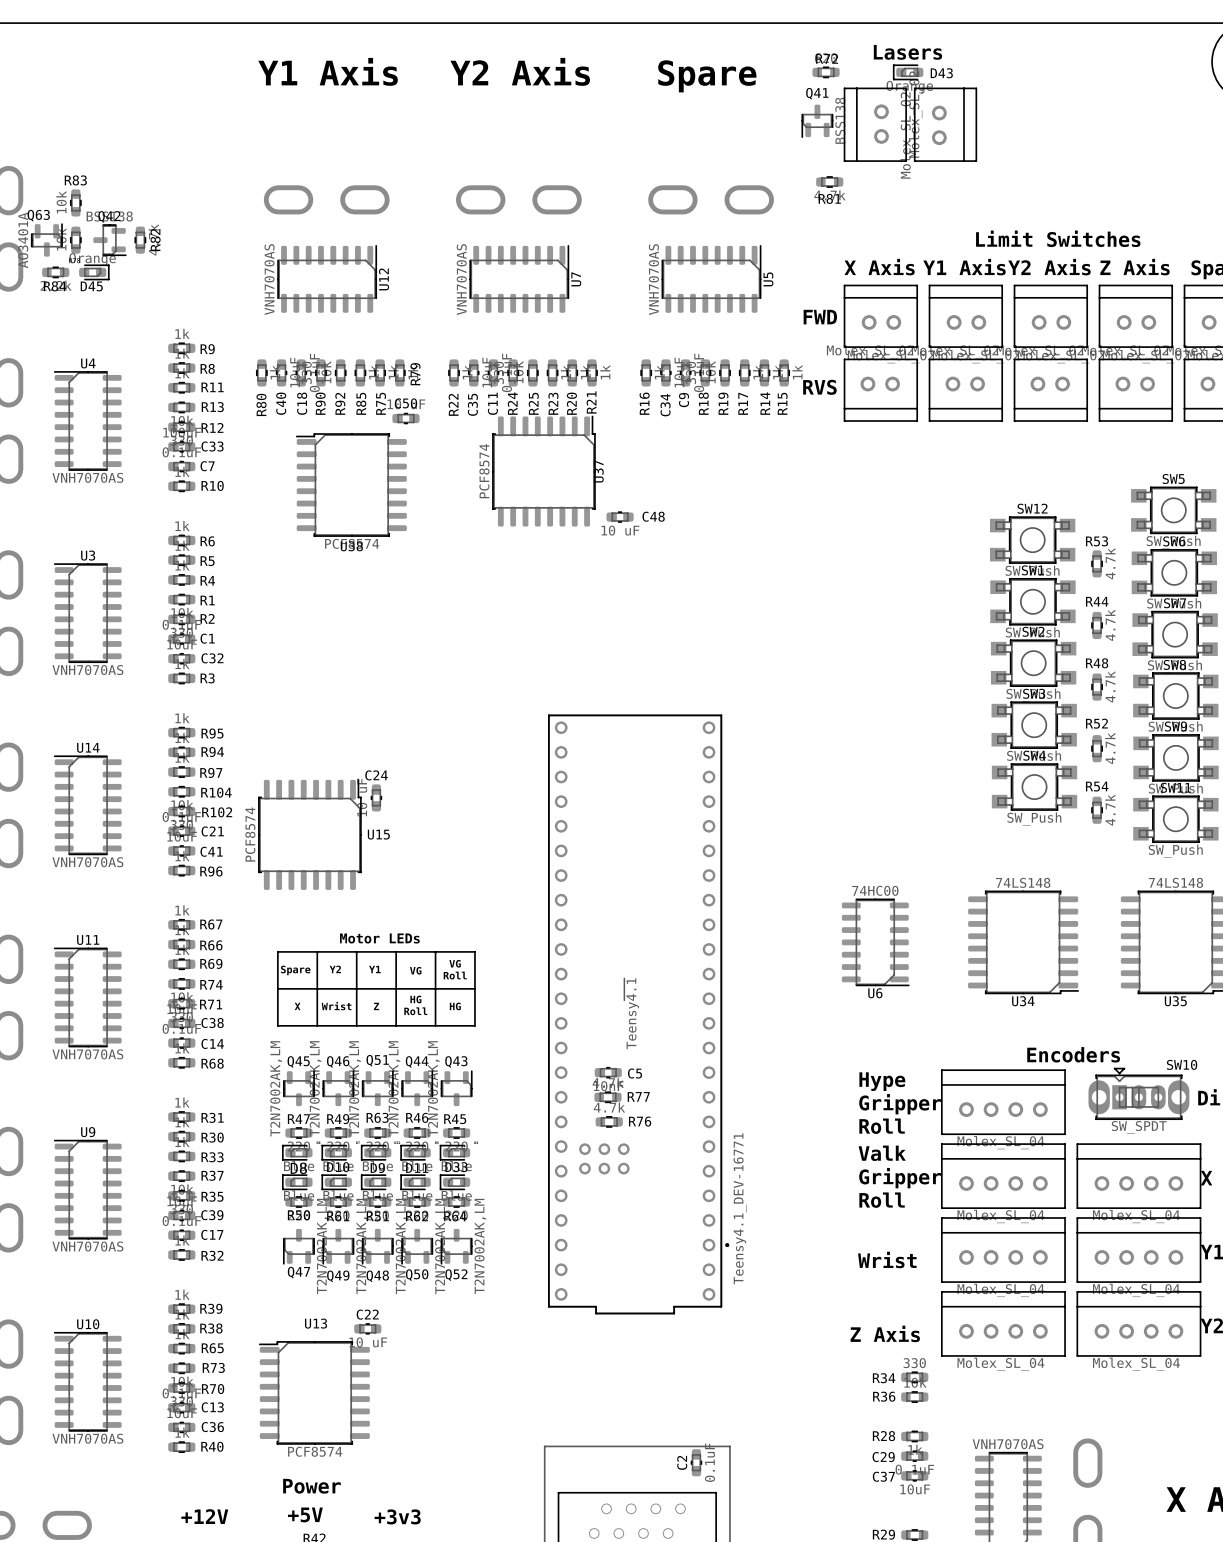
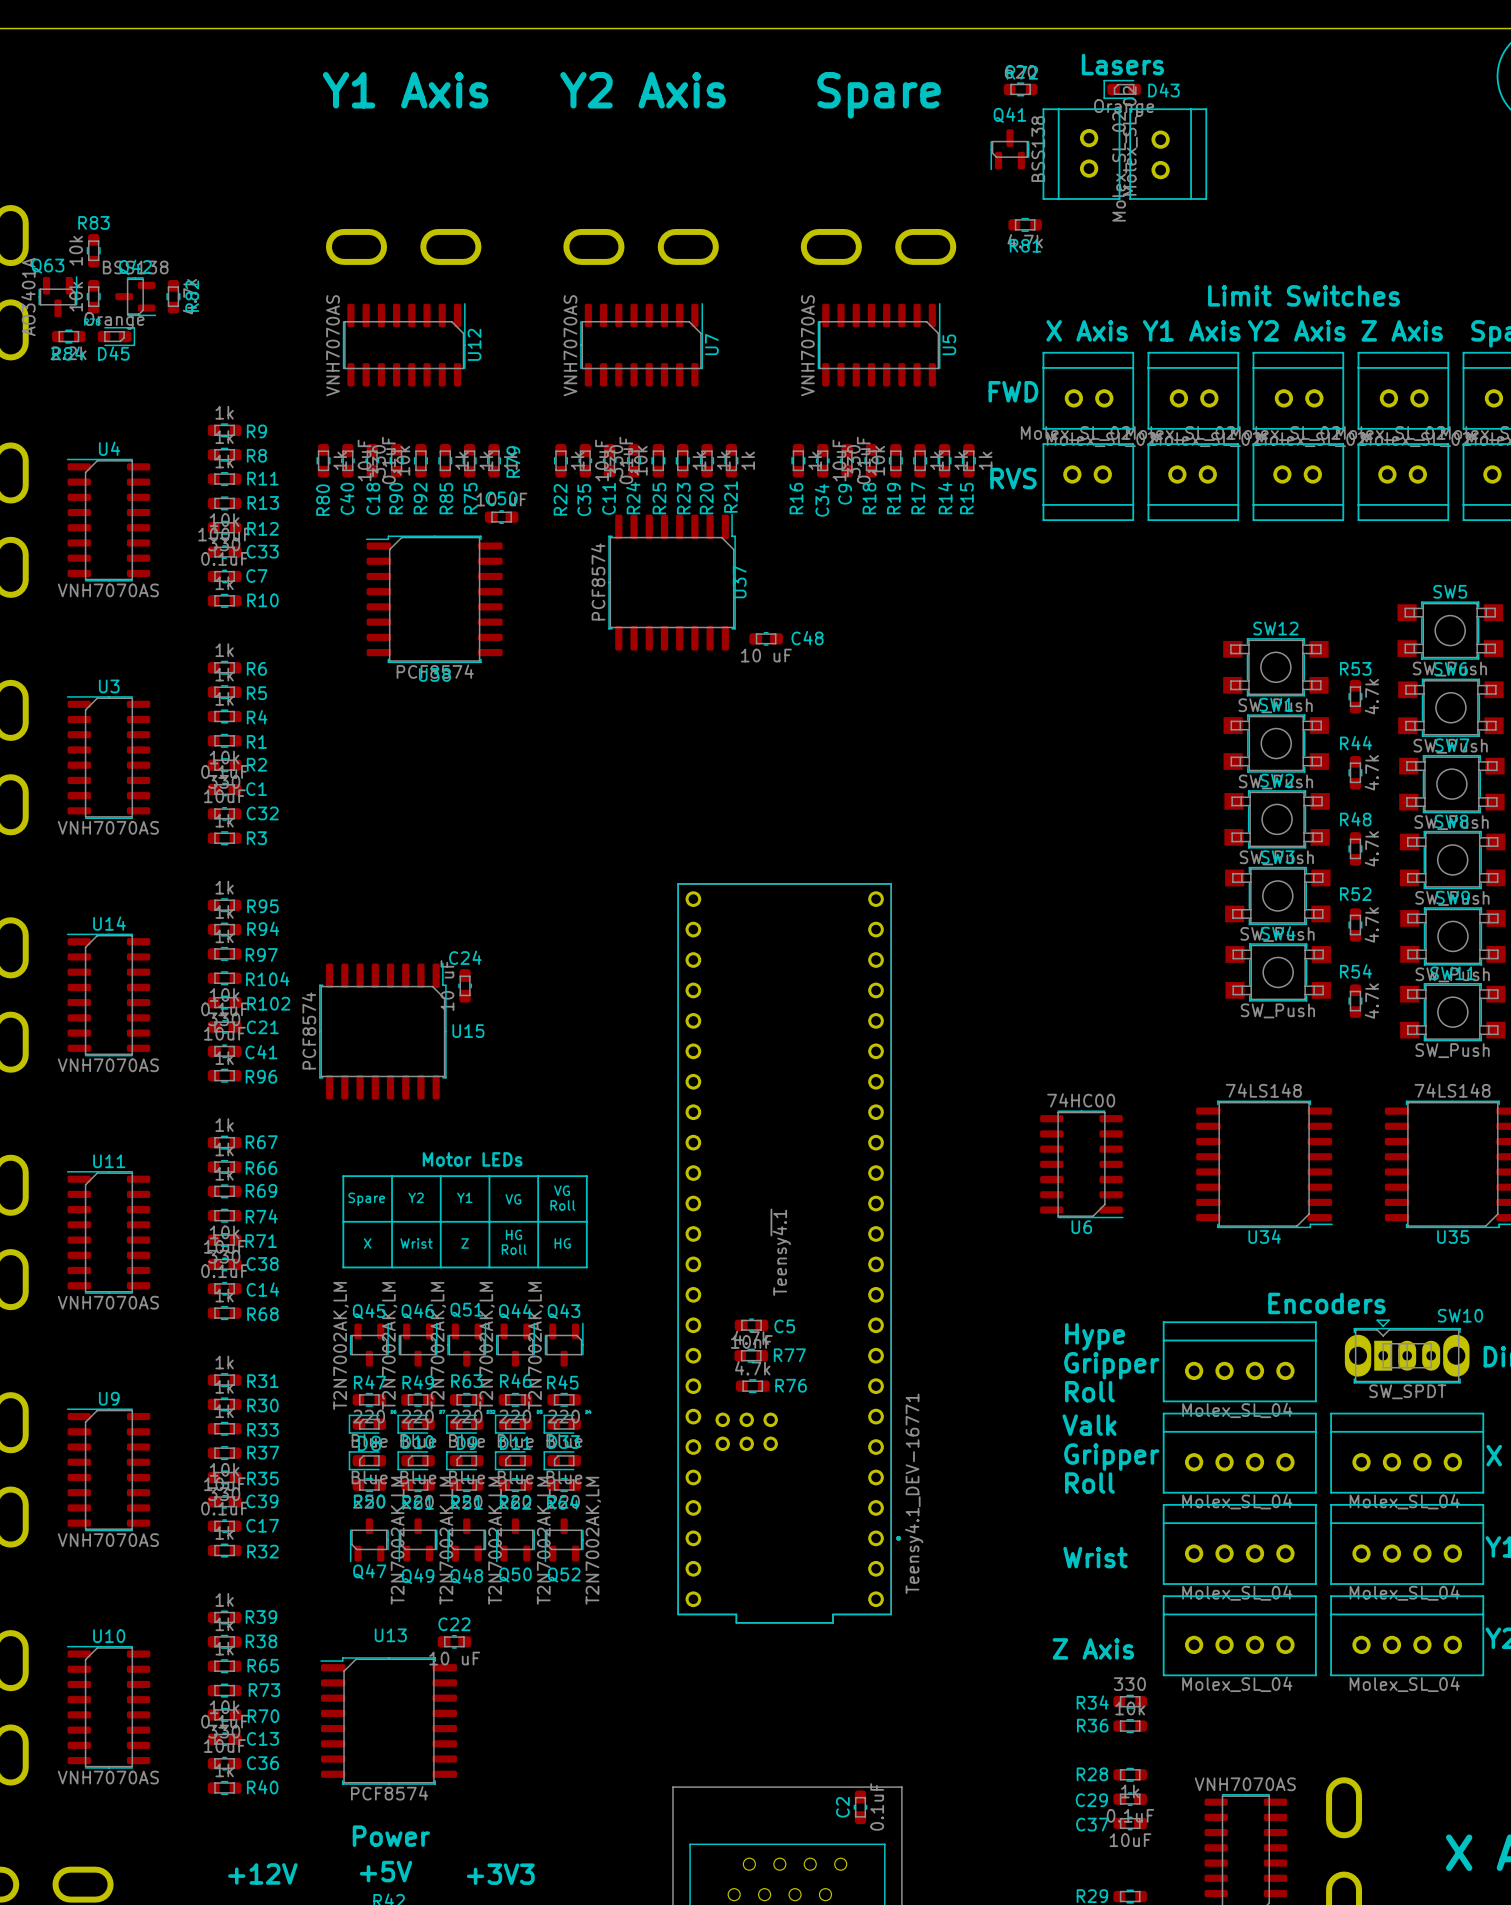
text: +3v3 (397, 1516) -> +3V3 (500, 1874)

